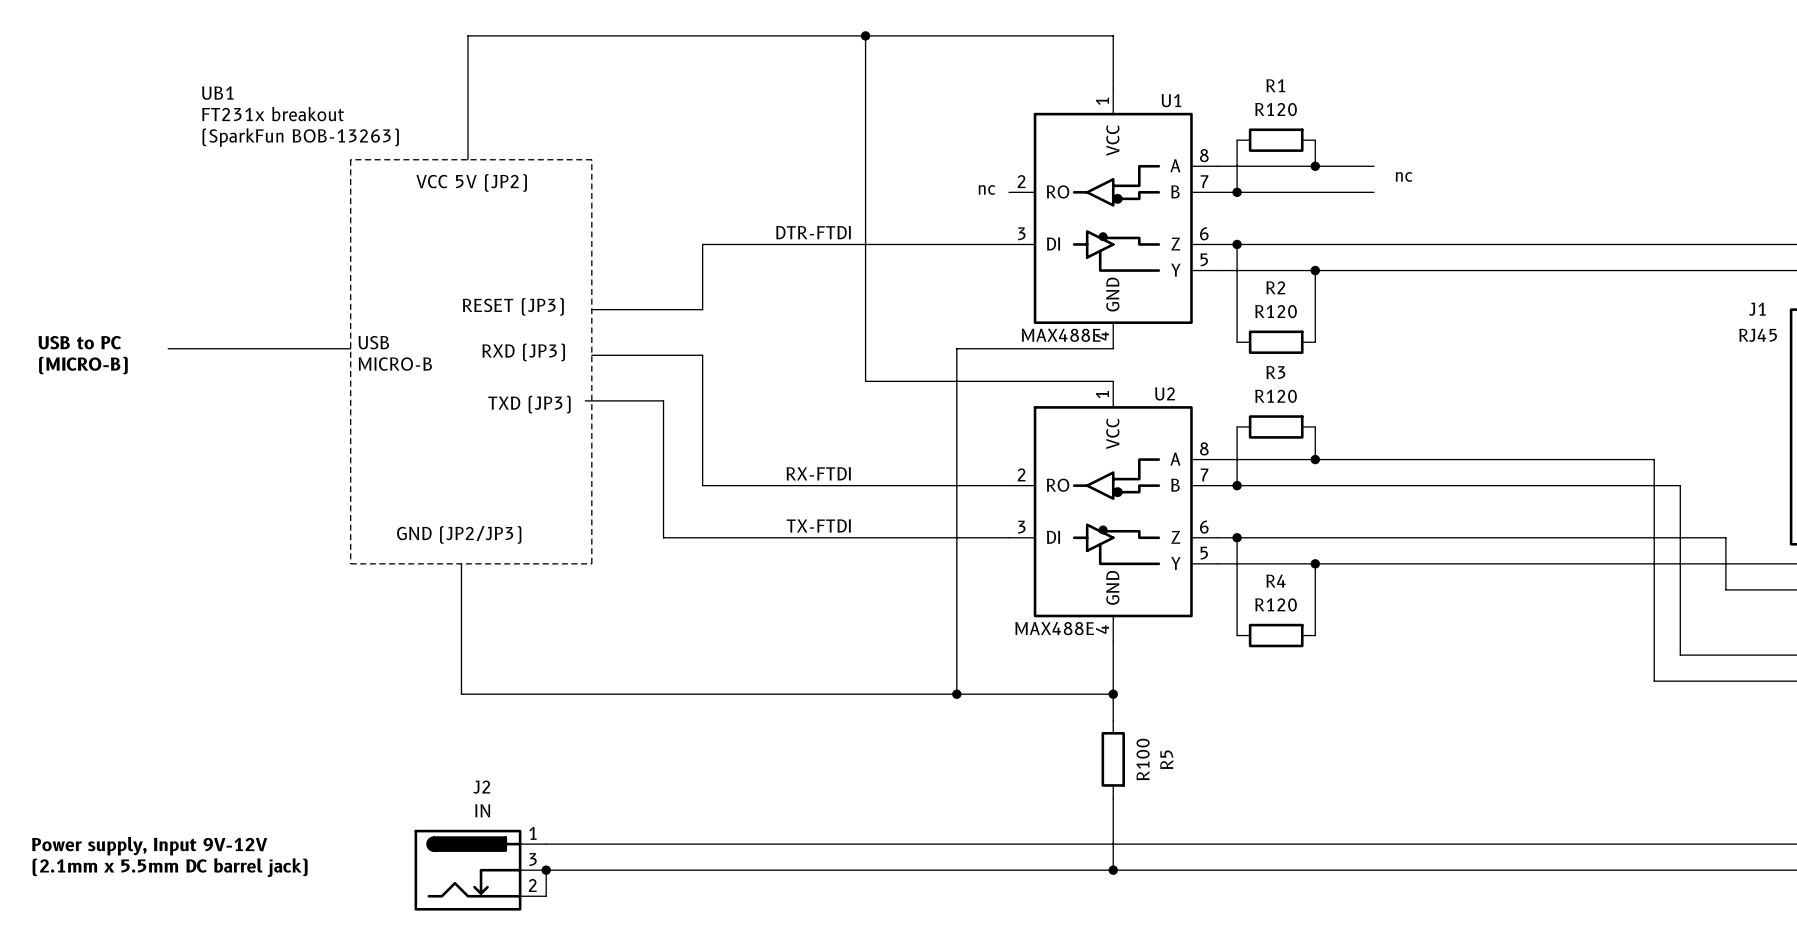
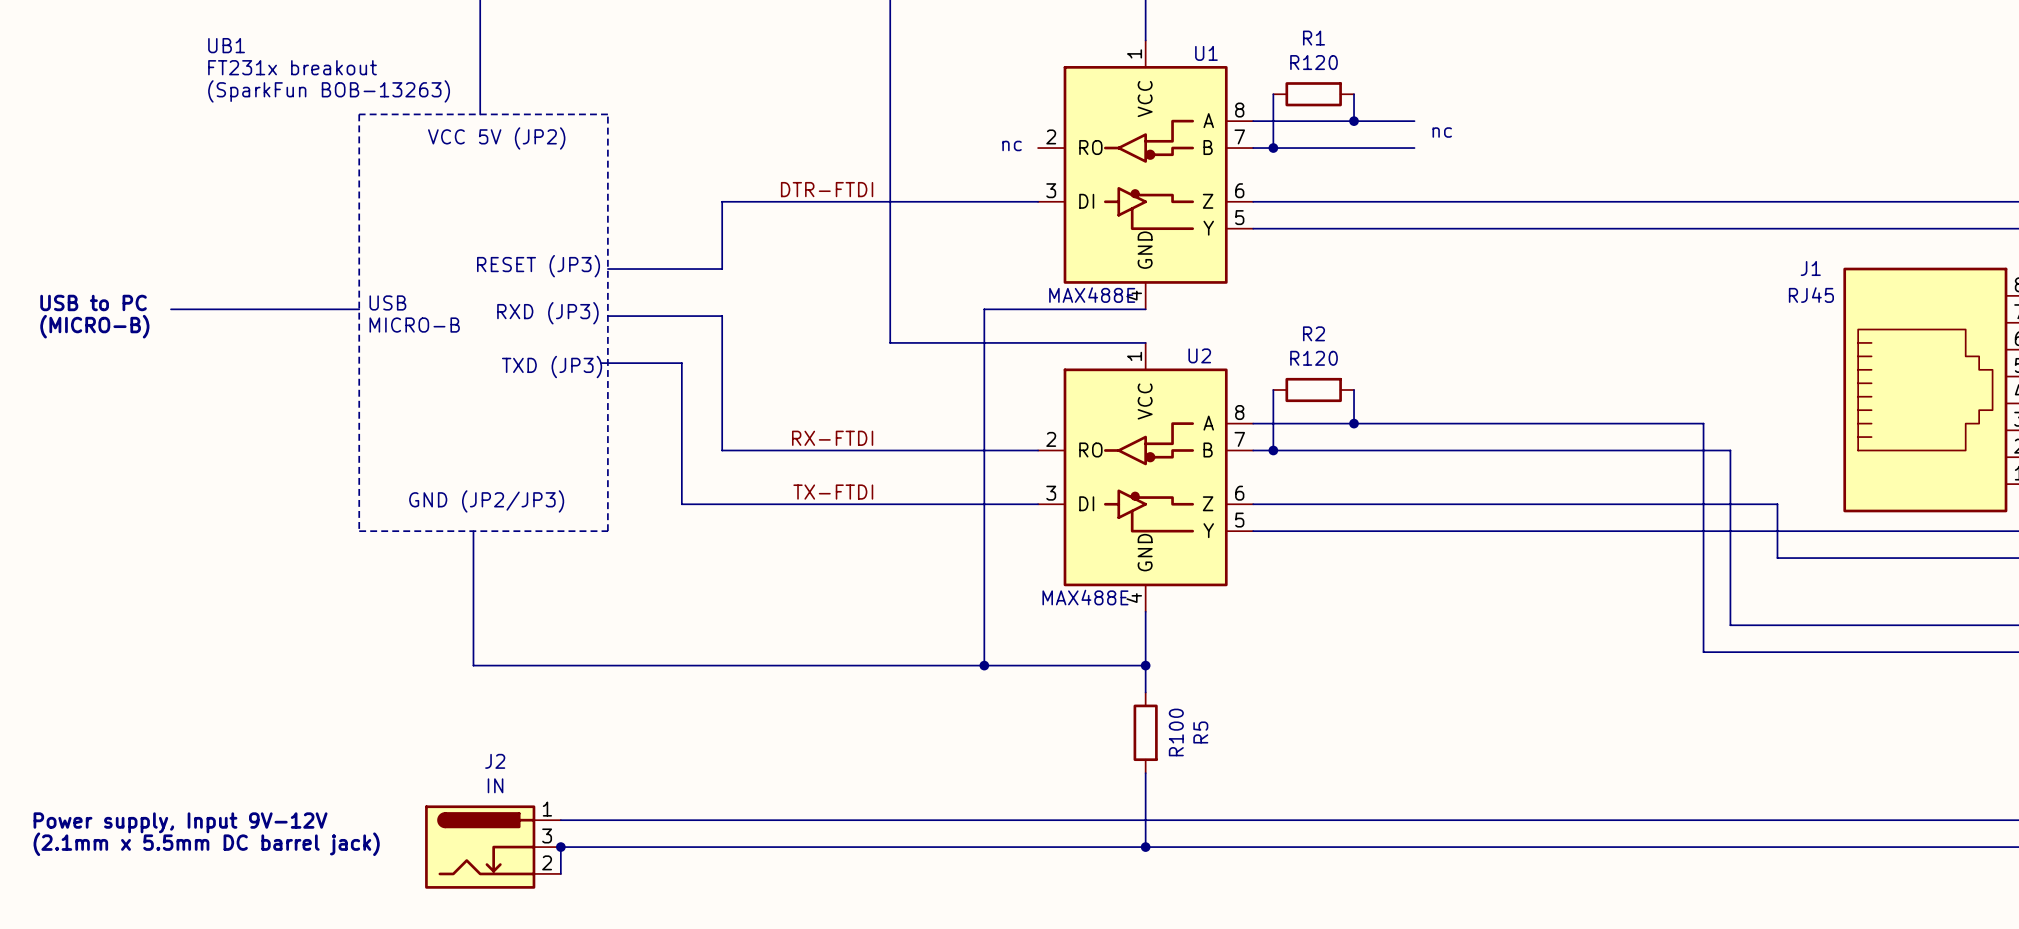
wire: (1237, 244) (1237, 342) -> none
junction: (1237, 244) -> none
wire: (1315, 270) (1315, 342) -> none
junction: (1315, 270) -> none
R2: R120 (1276, 342) -> none
R3 name: R3 (1275, 372) -> R2 (1314, 333)
wire: (1237, 537) (1237, 635) -> none
junction: (1237, 537) -> none
wire: (1315, 563) (1315, 635) -> none
junction: (1315, 563) -> none
R4: R120 (1276, 635) -> none

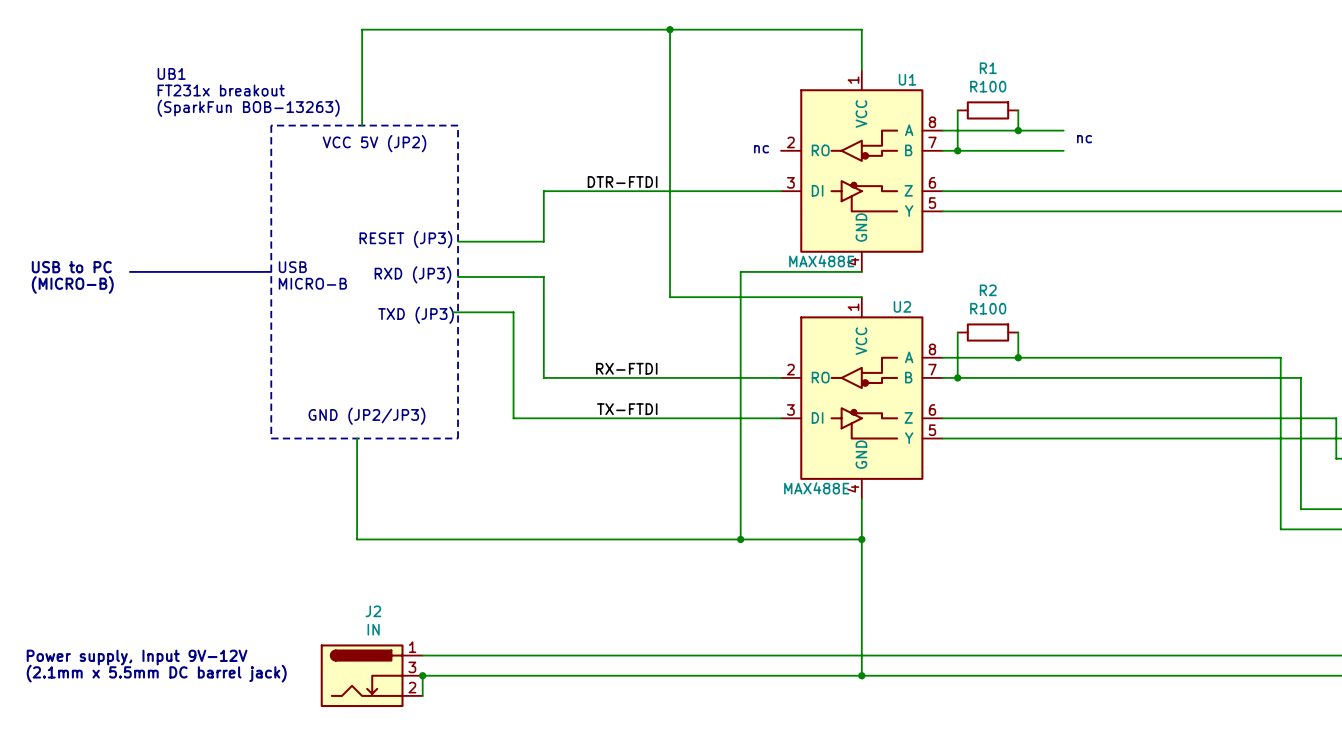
R1 value: R120 (1314, 62) -> R100 (988, 86)
R2 value: R120 (1314, 358) -> R100 (988, 308)
wire: none -> (861, 559) (861, 620)
R5: R100 (1145, 732) -> none

